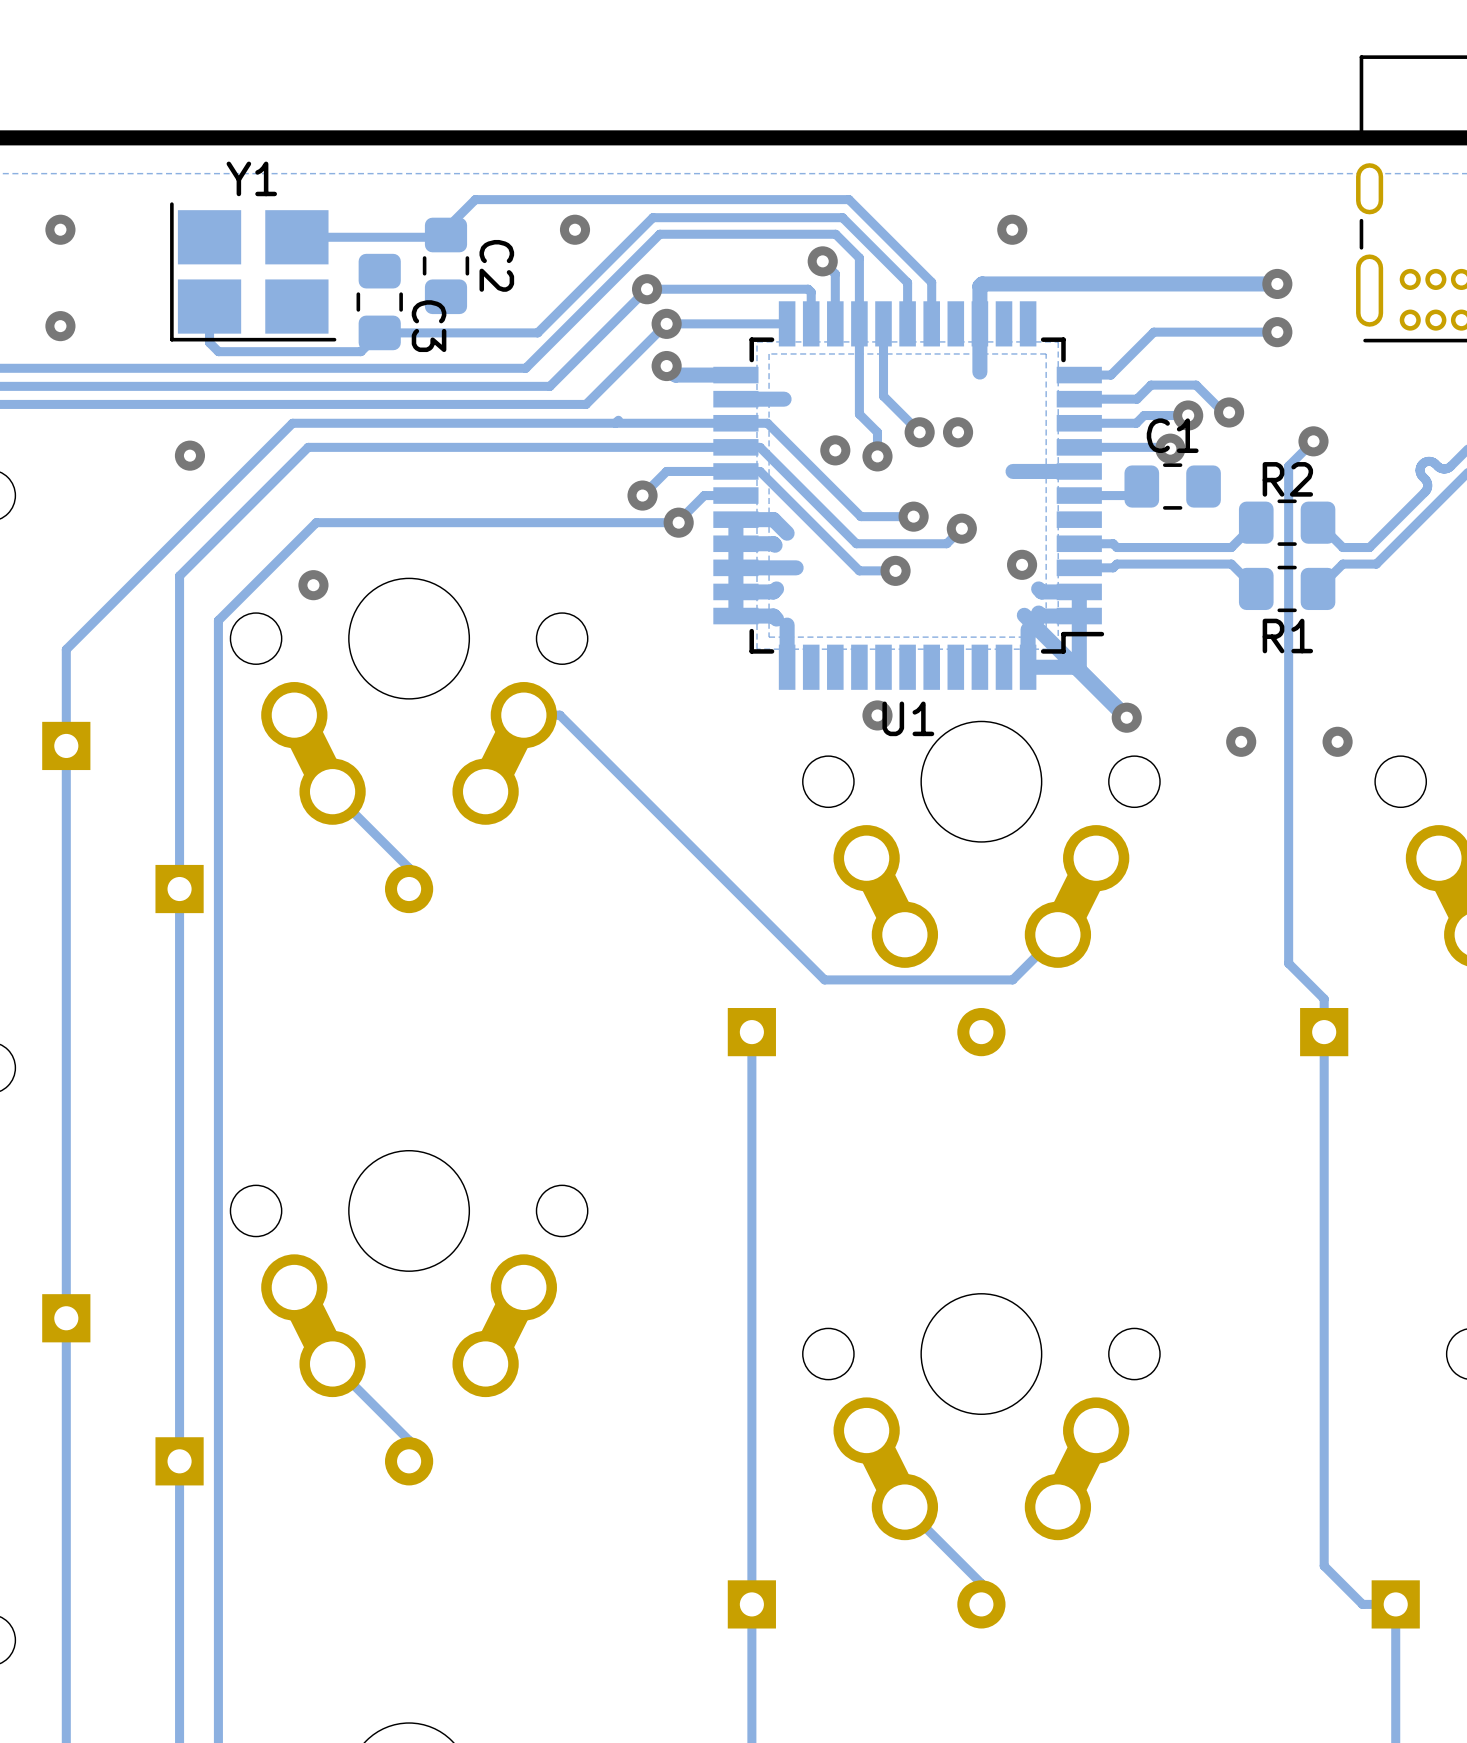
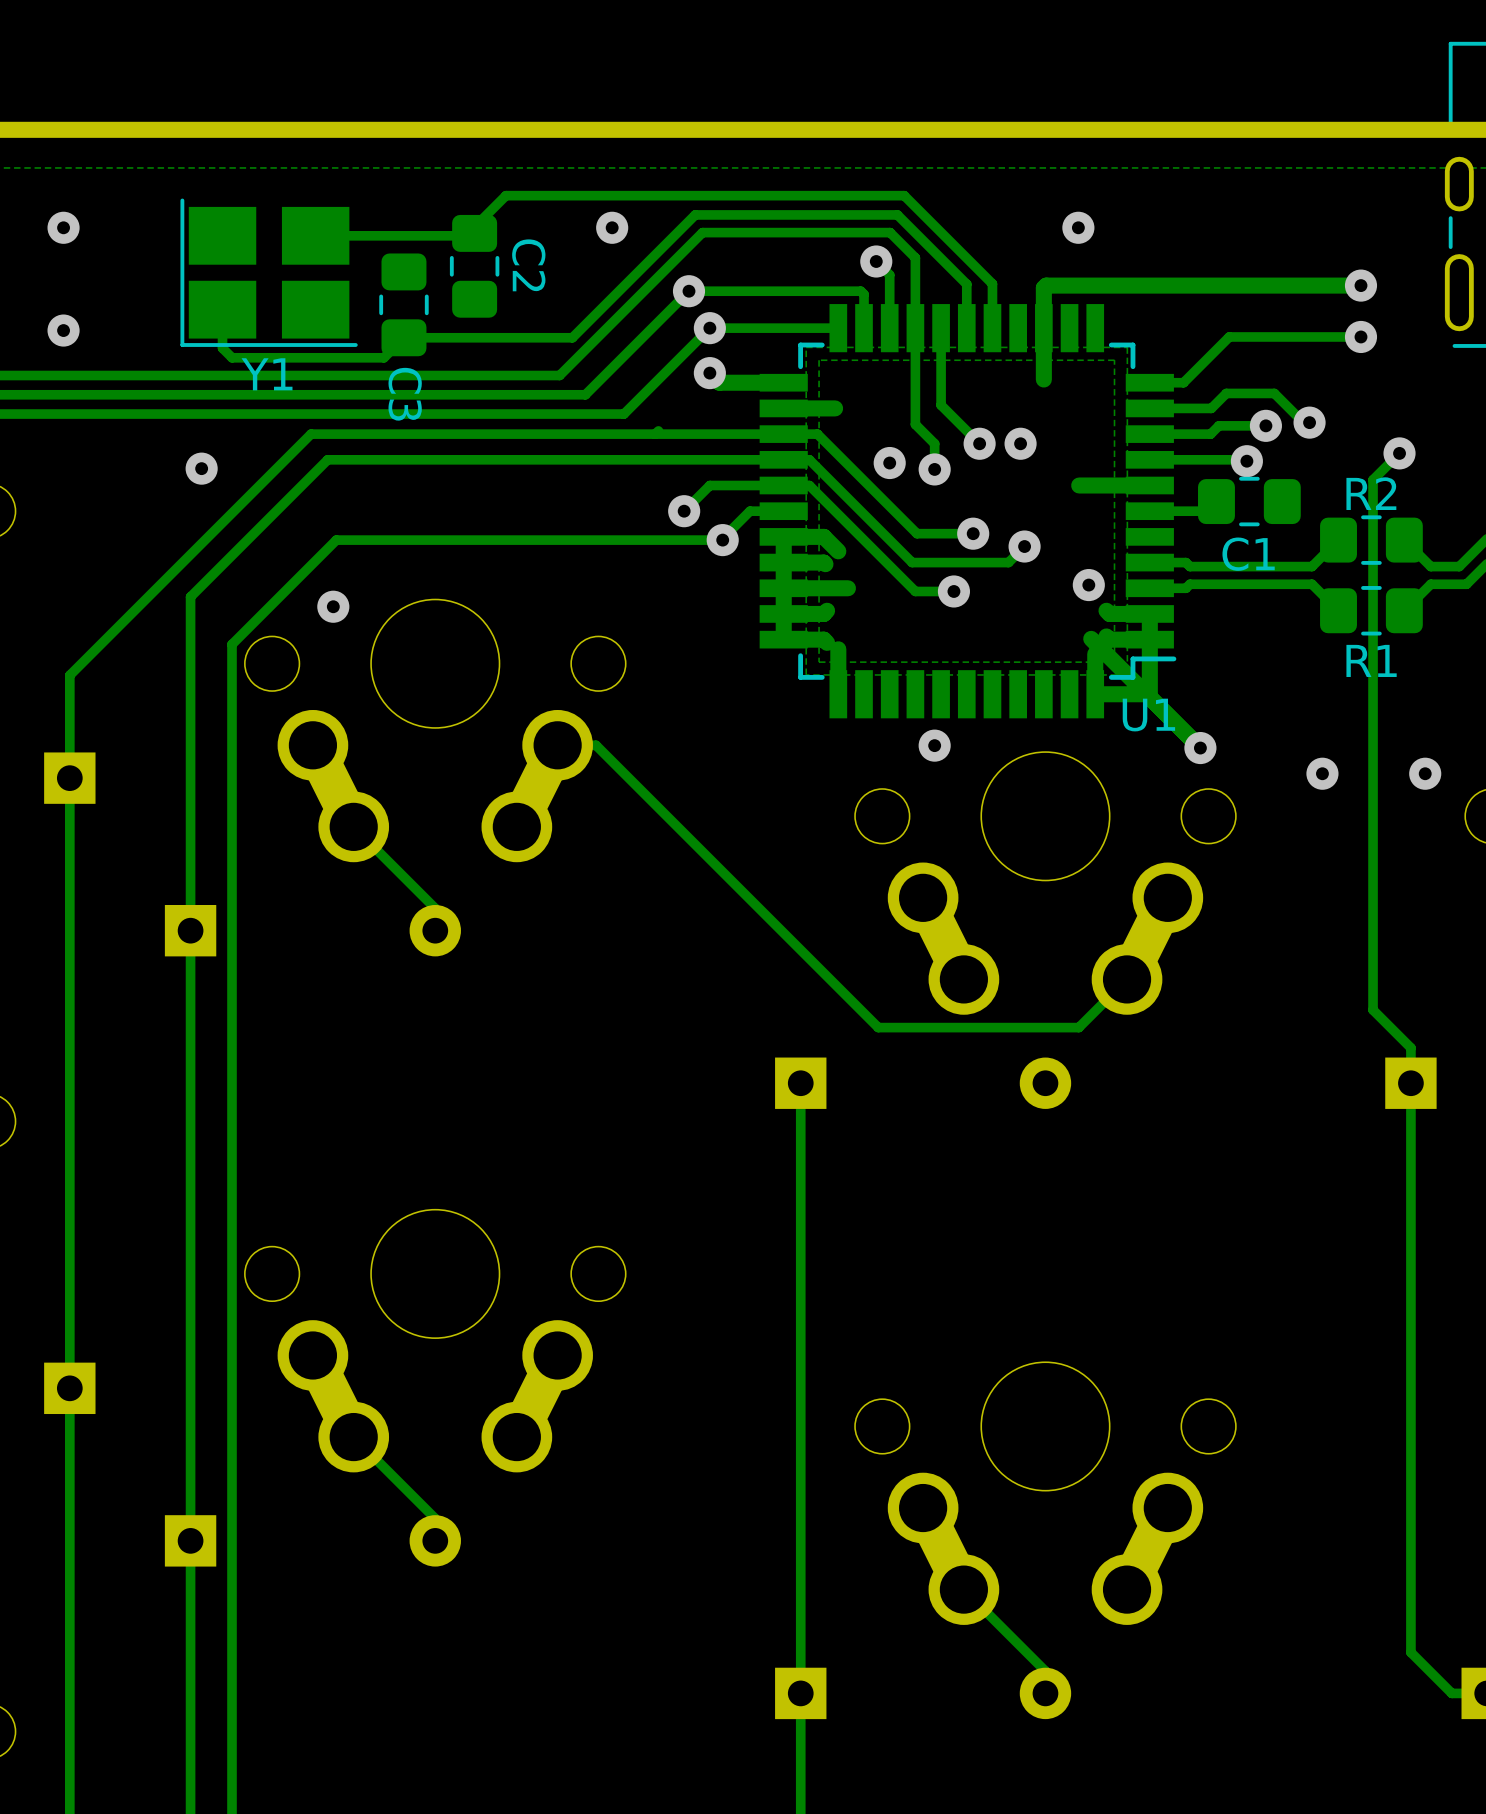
Y1 name position: Y1 (251, 178) -> Y1 (267, 374)
C3 name position: C3 (429, 326) -> C3 (405, 394)
C1 name position: C1 (1172, 435) -> C1 (1248, 554)
U1 name position: U1 (908, 718) -> U1 (1148, 715)

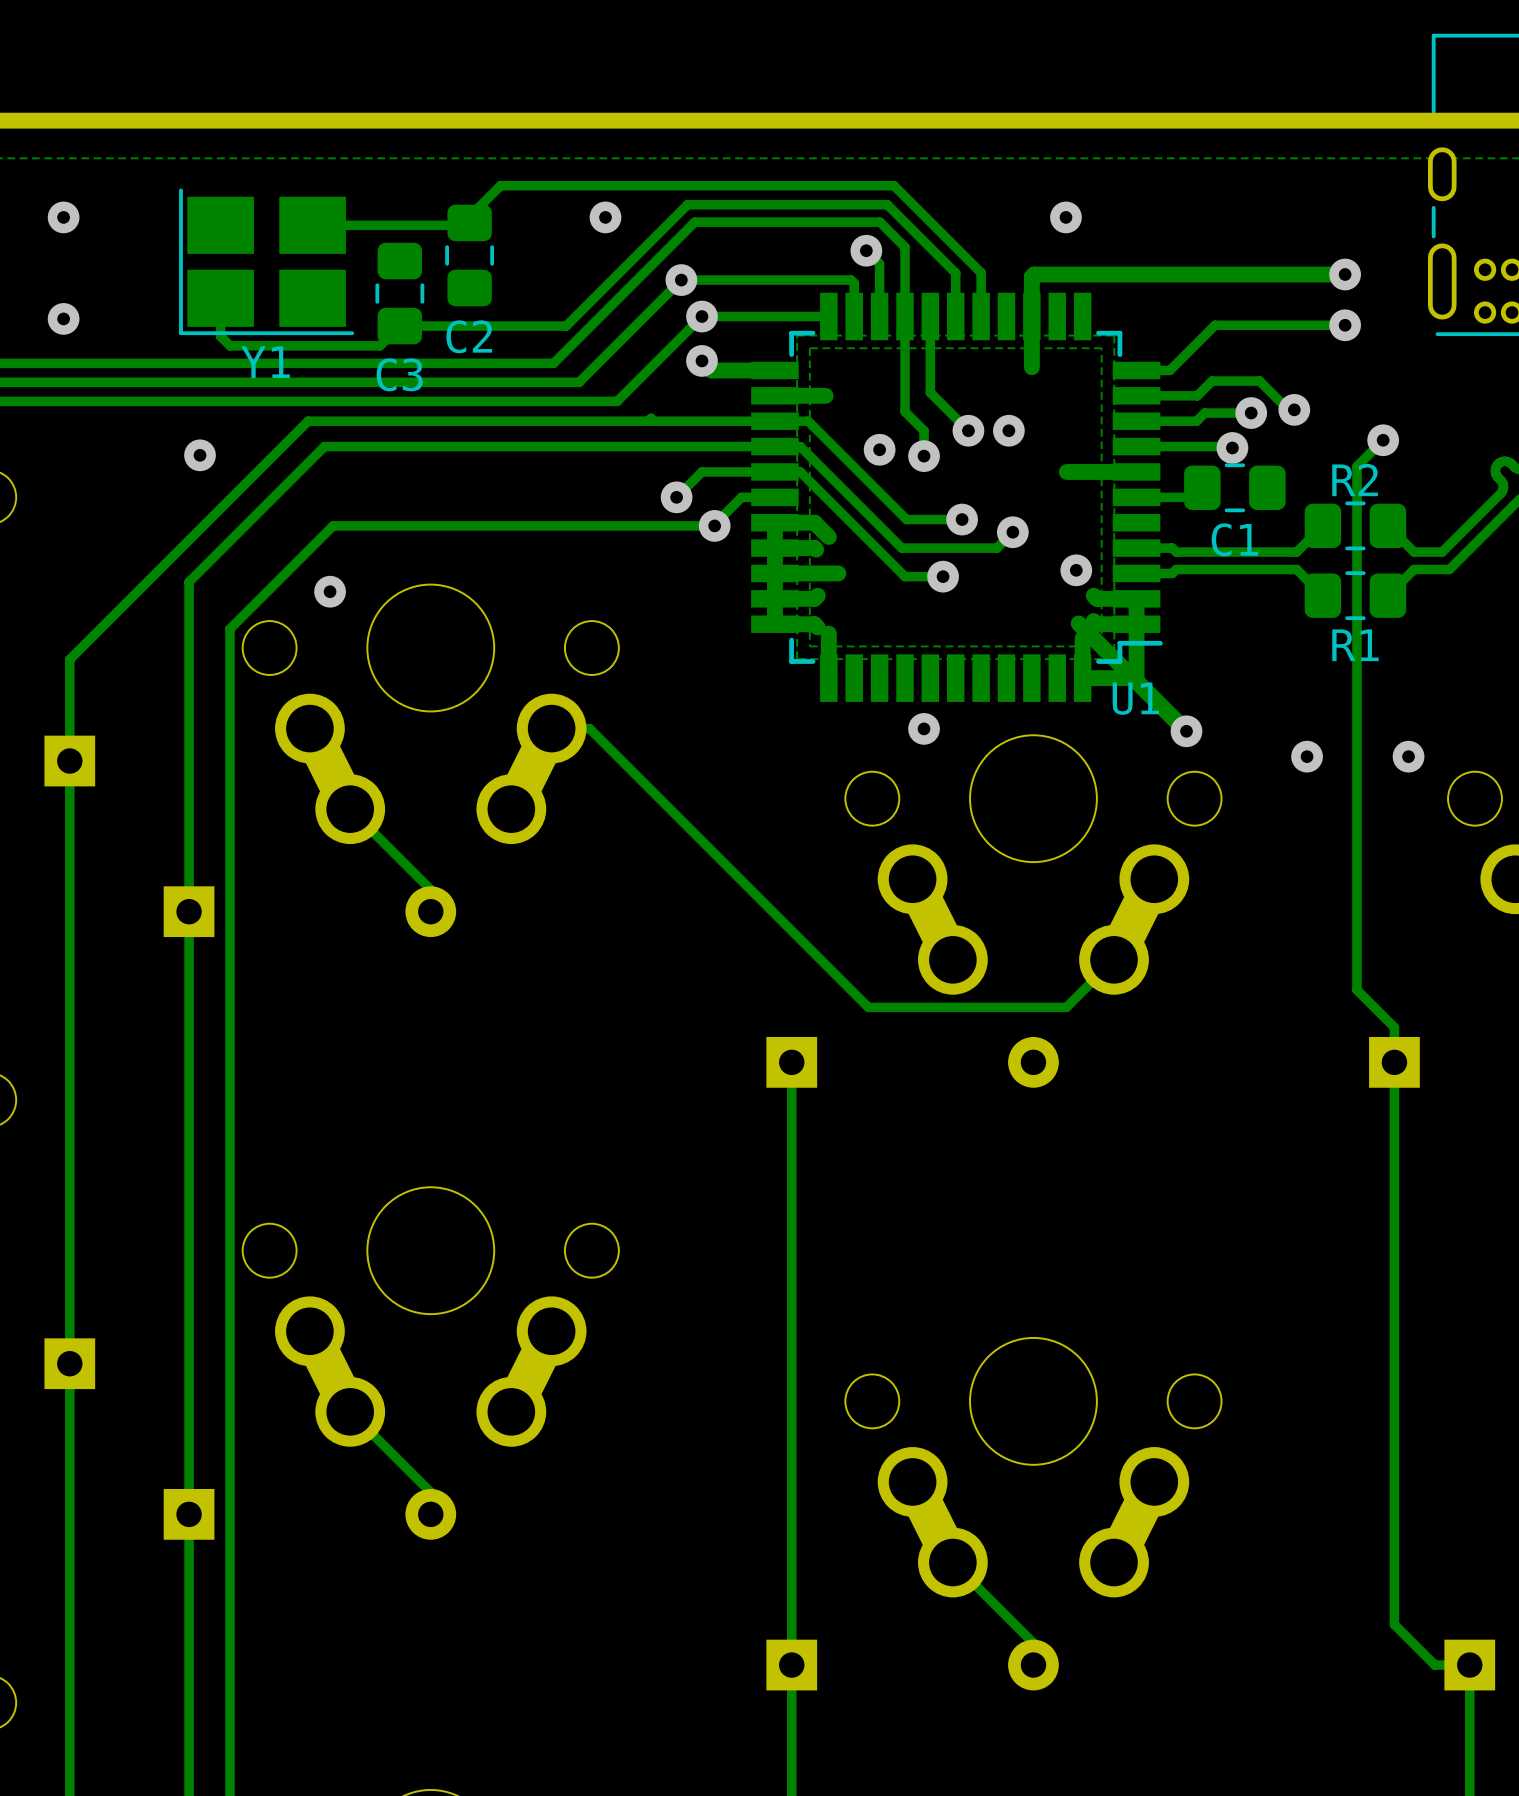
C2 name rotation: 0° (528, 265) -> 90° counterclockwise (469, 336)
C2 name position: C2 (528, 265) -> C2 (469, 336)
C3 name rotation: 0° (405, 394) -> 90° counterclockwise (399, 374)

